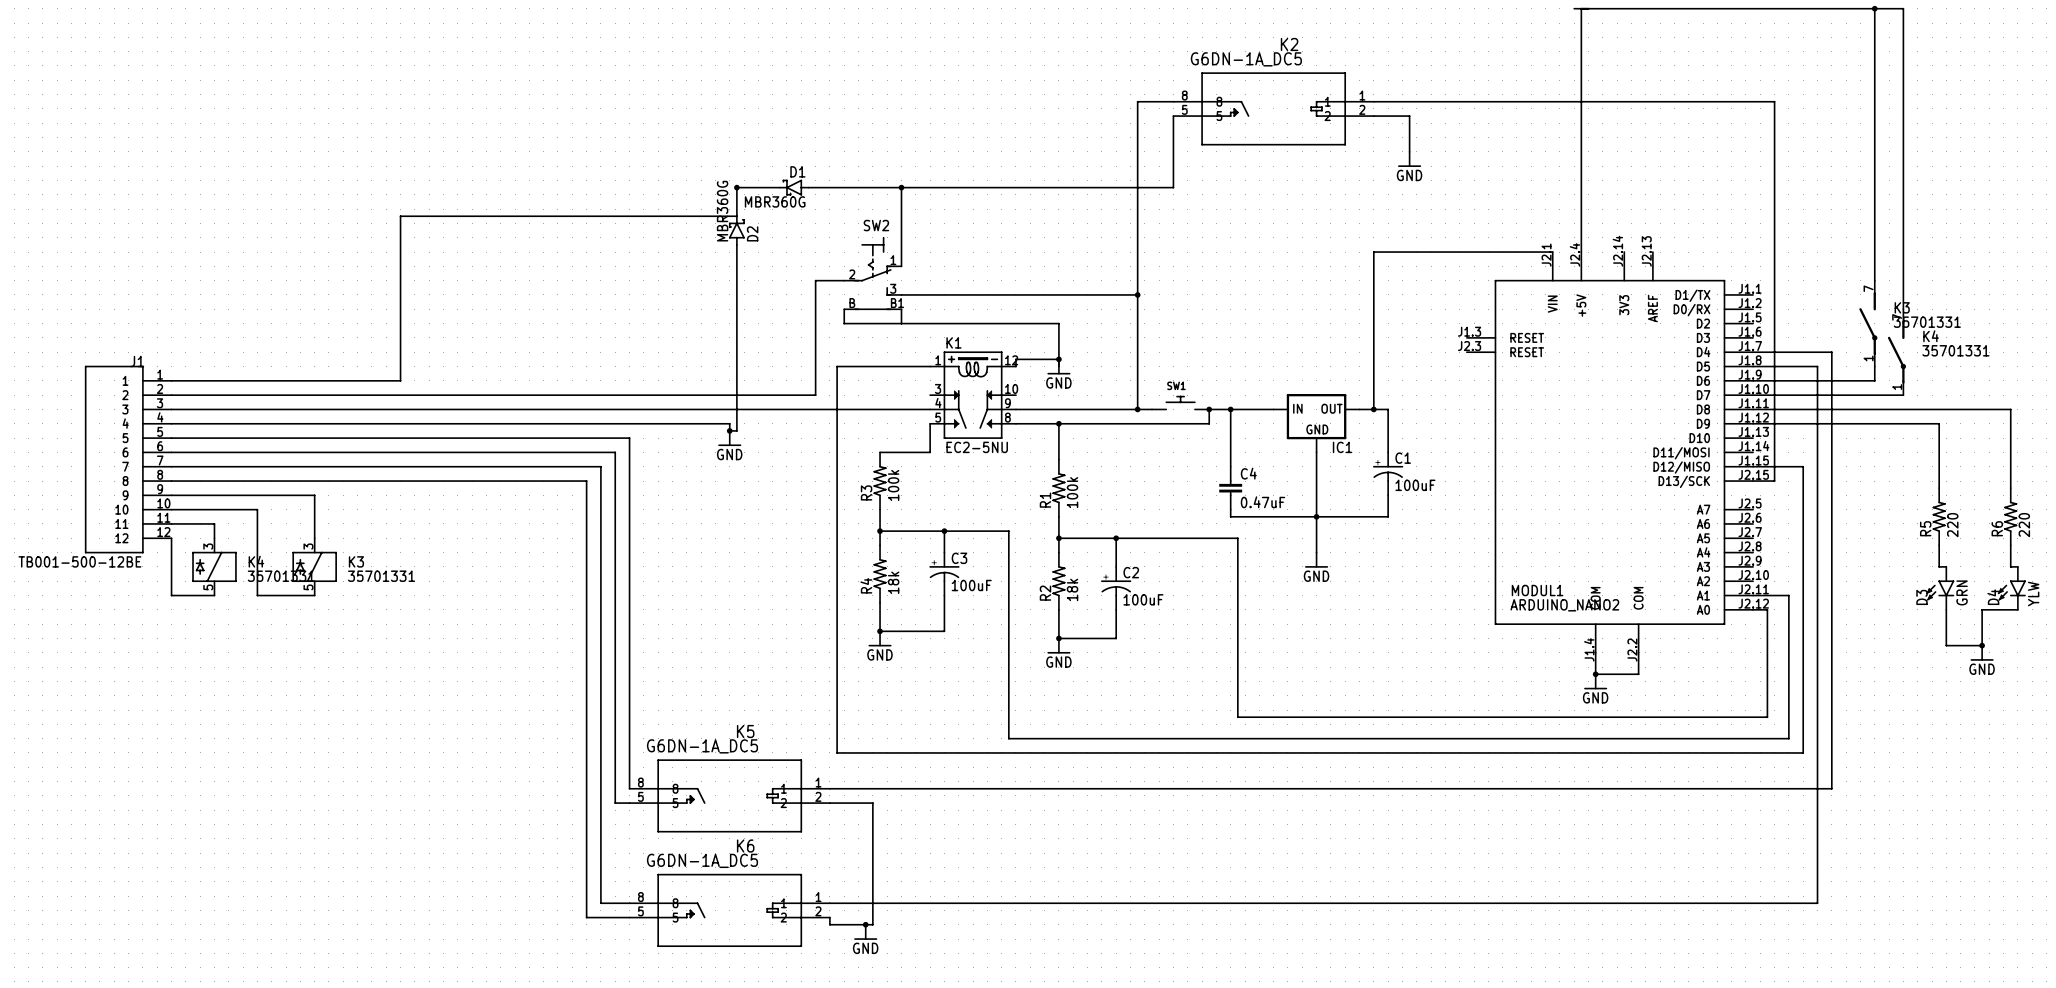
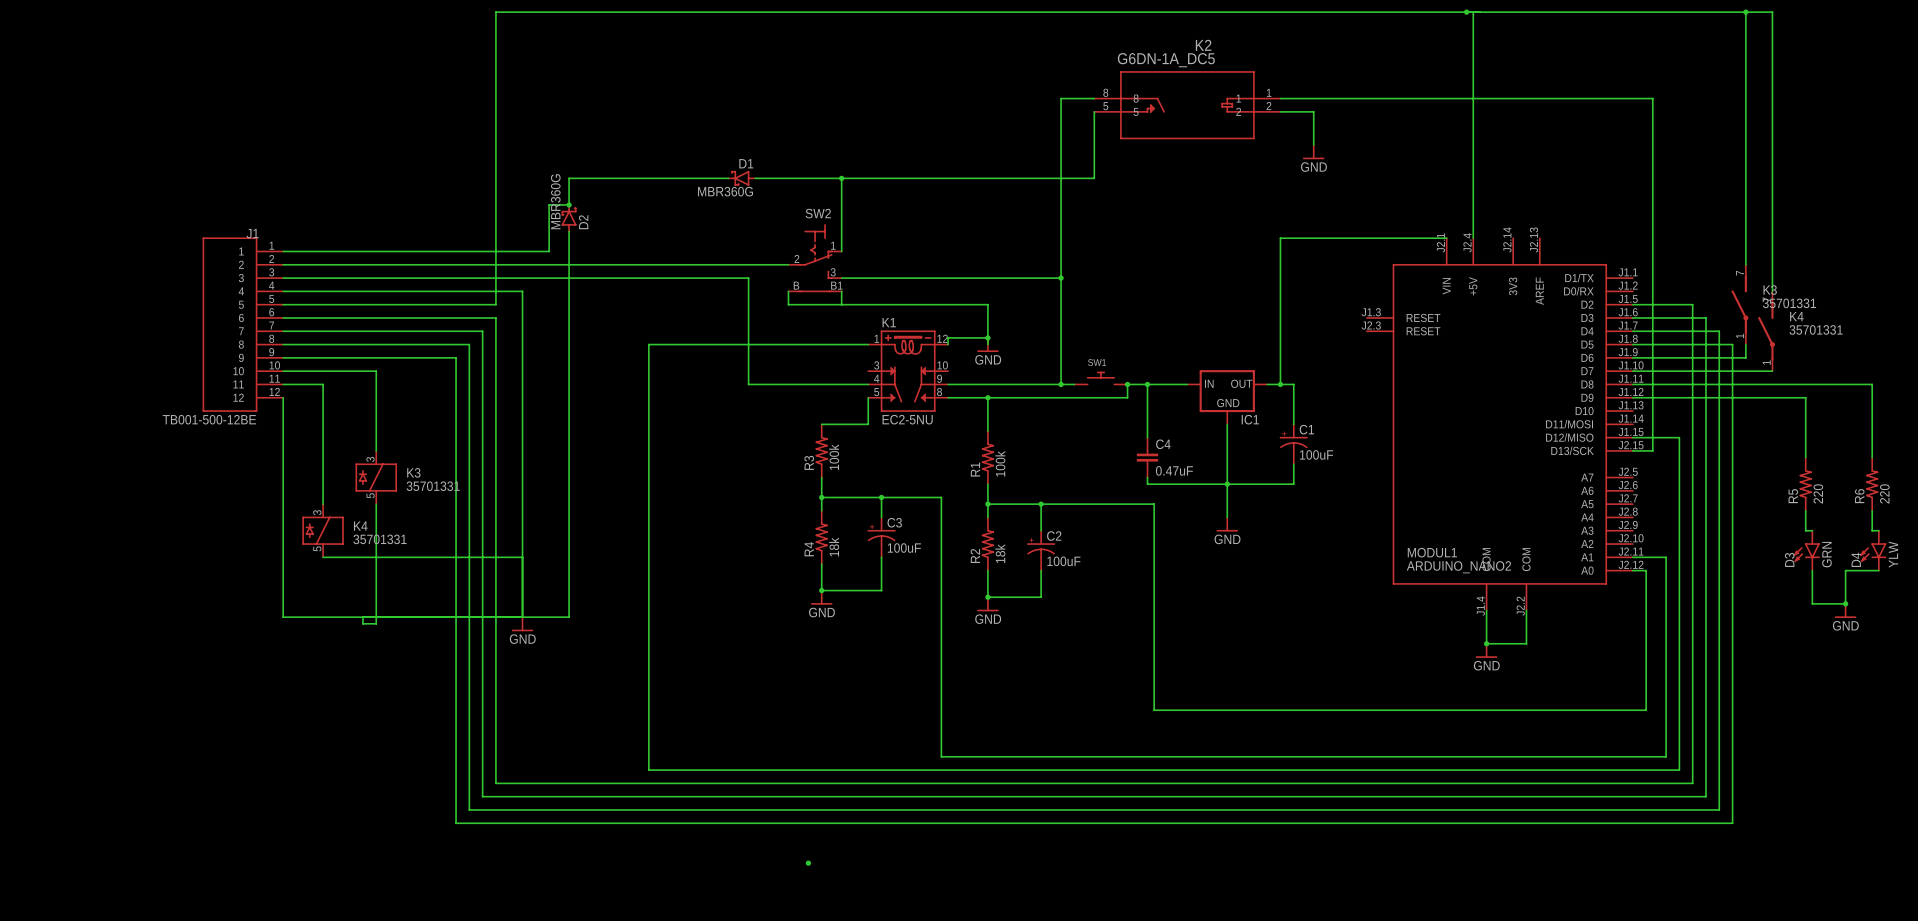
wire: none -> (1466, 12) (495, 12) (495, 304) (283, 304)
junction: none -> (1466, 12)
wire: (736, 187) (736, 216) (608, 216) -> (688, 178) (569, 178) (569, 204)
junction: (736, 187) -> none
wire: (586, 216) (400, 216) (400, 380) -> (549, 204) (549, 251) (283, 251)
junction: none -> (569, 204)
D2 position: (736, 230) -> (569, 218)
wire: none -> (569, 231) (569, 617) (283, 617) (283, 397)
wire: (736, 244) (736, 430) (729, 430) (729, 423) (171, 423) -> none
wire: (815, 280) (815, 395) (400, 395) -> (761, 264) (283, 264)
wire: none -> (283, 291) (522, 291) (522, 617)
wire: none -> (1632, 304) (1692, 304) (1692, 344) (1732, 344) (1732, 823) (456, 823) (456, 357) (376, 357)
wire: none -> (1632, 317) (1705, 317) (1705, 331) (1719, 331) (1719, 809) (469, 809) (469, 344) (283, 344)
wire: (837, 366) (837, 752) (1803, 752) -> (781, 344) (648, 344) (648, 770) (1679, 770) (1679, 703)
wire: (171, 380) (300, 380) -> none
wire: (171, 395) (300, 395) -> none
wire: none -> (376, 371) (376, 450)
wire: (171, 409) (300, 409) -> none
wire: (343, 409) (801, 409) -> (283, 278) (748, 278) (748, 384)
wire: none -> (323, 384) (323, 504)
junction: (729, 430) -> none
wire: (171, 438) (629, 438) (629, 788) -> none
power symbol: GND (729, 438) -> none
wire: (171, 452) (615, 452) (615, 803) (629, 803) -> none
J1 position: (128, 459) -> (242, 324)
wire: (171, 466) (600, 466) (600, 903) (629, 903) -> none
wire: (171, 481) (586, 481) (586, 917) (629, 917) -> none
wire: (171, 495) (314, 495) (314, 538) -> none
wire: (171, 509) (257, 509) (257, 595) (314, 595) -> none
wire: (171, 523) (214, 523) (214, 538) -> none
wire: (171, 538) (171, 595) (214, 595) -> none
wire: none -> (376, 504) (376, 623) (362, 623) (362, 617)
K4 position: (214, 566) -> (323, 530)
K3 position: (314, 566) -> (376, 477)
wire: none -> (323, 557) (522, 557)
power symbol: none -> GND (522, 624)
wire: (1595, 674) (1638, 674) -> (1486, 630) (1486, 643) (1526, 643) (1526, 630)
junction position: (1595, 674) -> (1486, 643)
power symbol position: GND (1595, 681) -> GND (1486, 650)
wire: (1237, 717) (1767, 717) -> (1154, 670) (1154, 710) (1646, 710) (1646, 670)
wire: (1008, 738) (1788, 738) -> (941, 690) (941, 756) (1666, 756) (1666, 690)
wire: (829, 788) (1831, 788) -> (283, 331) (482, 331) (482, 796) (1705, 796) (1705, 736)
K5: G6DN-1A_DC5 (729, 795) -> none
wire: (829, 803) (872, 803) (872, 924) (829, 924) (829, 917) -> none
wire: (1817, 838) (1817, 903) (829, 903) -> (1692, 783) (495, 783) (495, 317) (283, 317)
K6: G6DN-1A_DC5 (729, 910) -> none
power symbol: GND (865, 932) -> none

